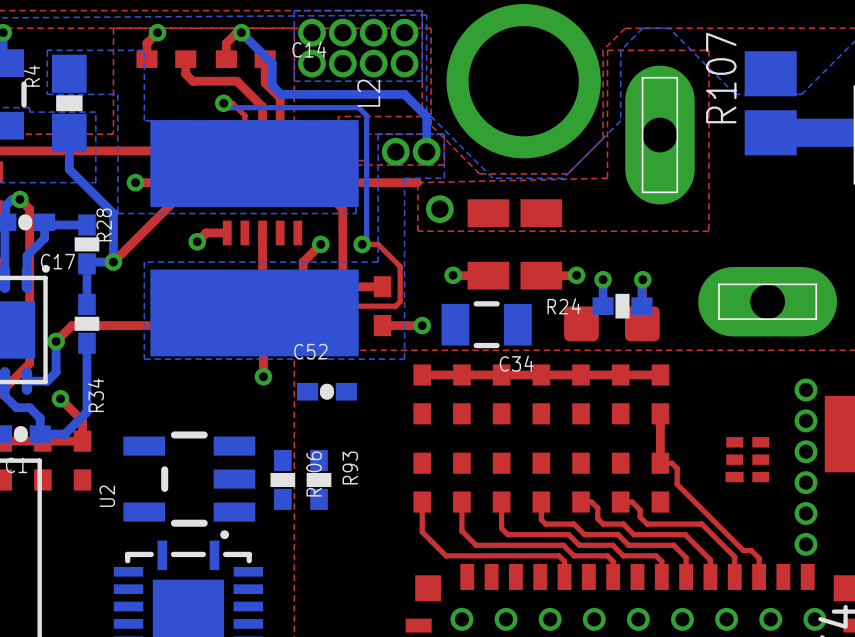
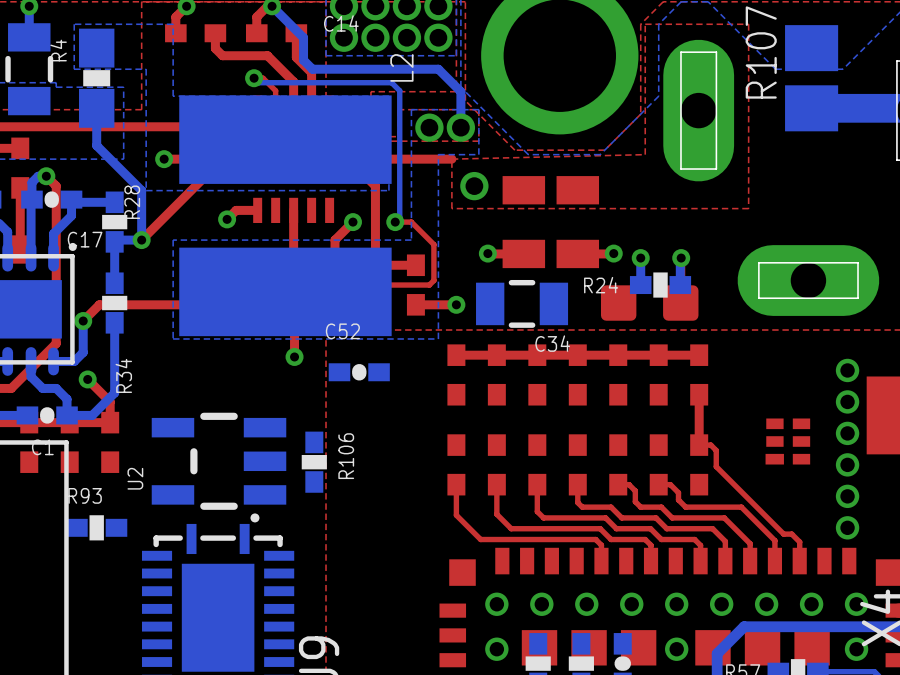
R93 rotation: 0° (319, 479) -> 90° clockwise (96, 527)
R93 position: (319, 479) -> (96, 527)

